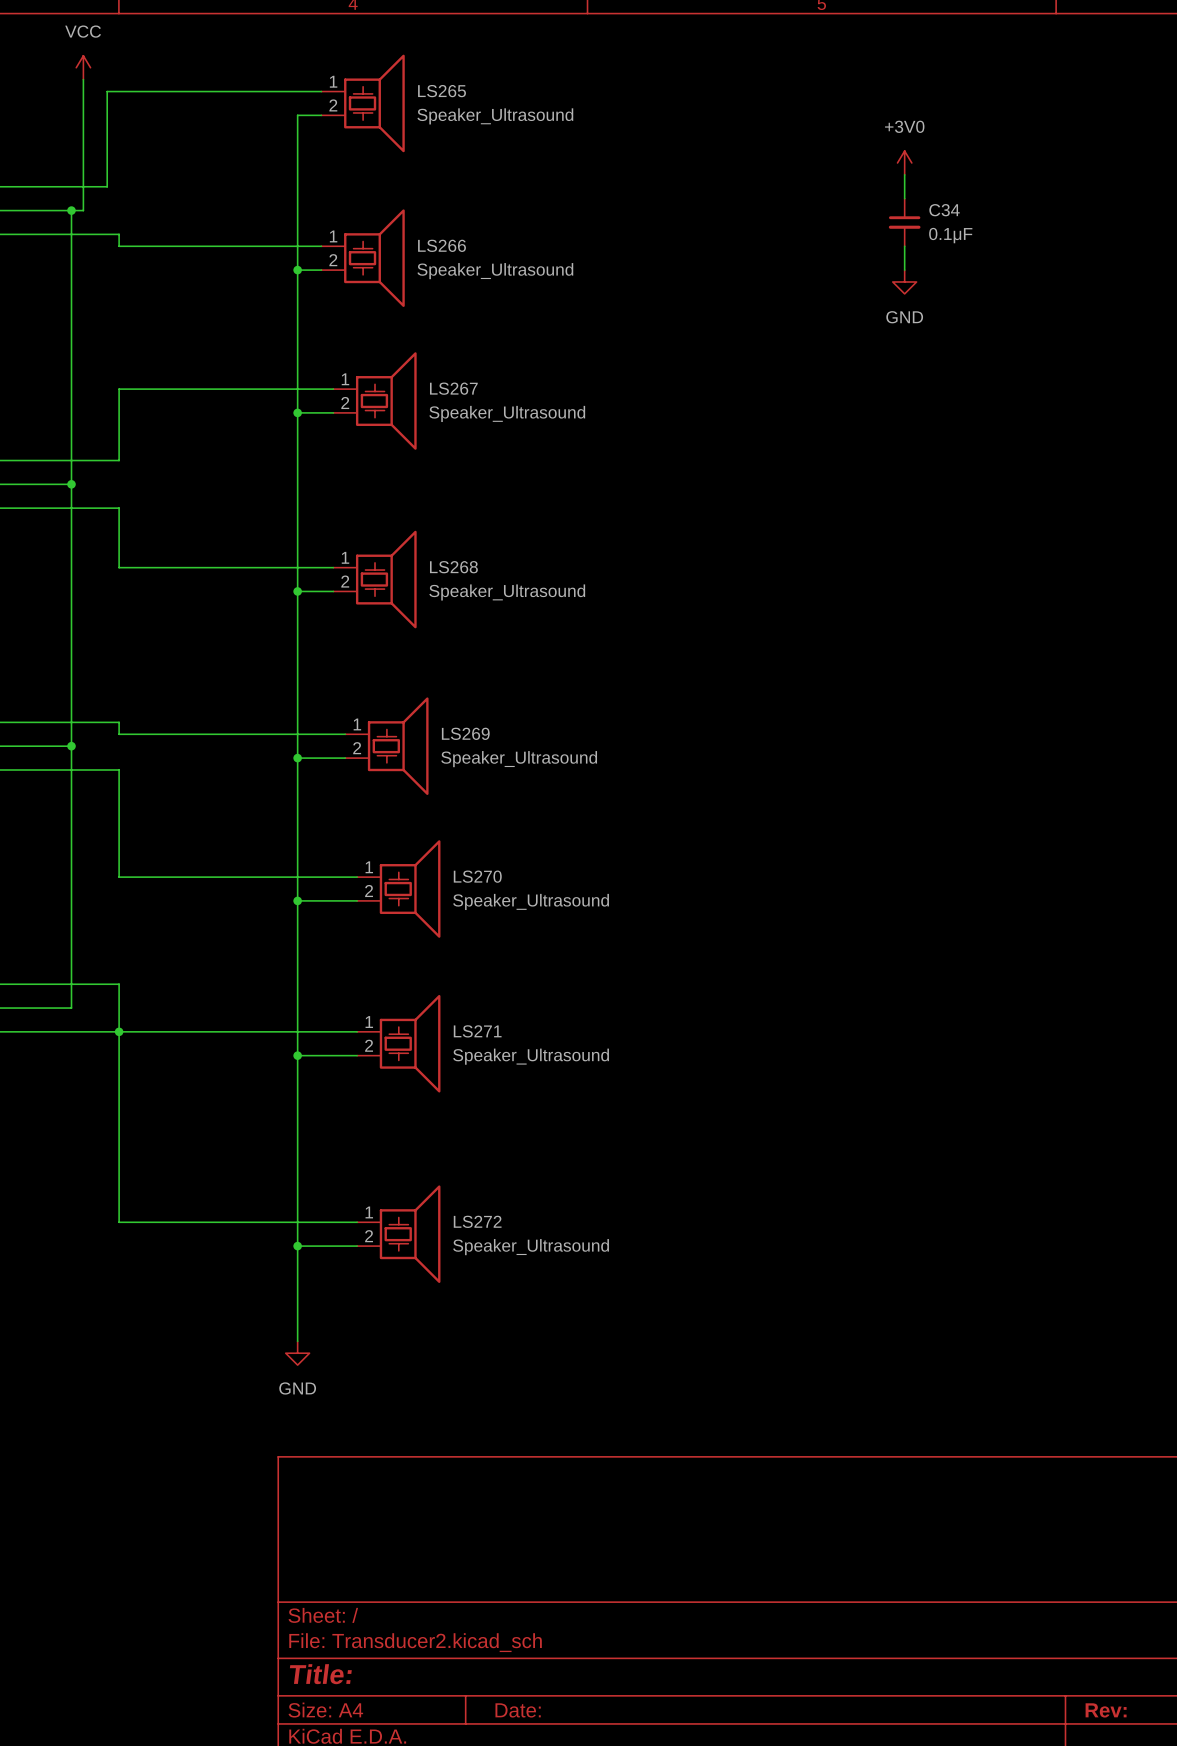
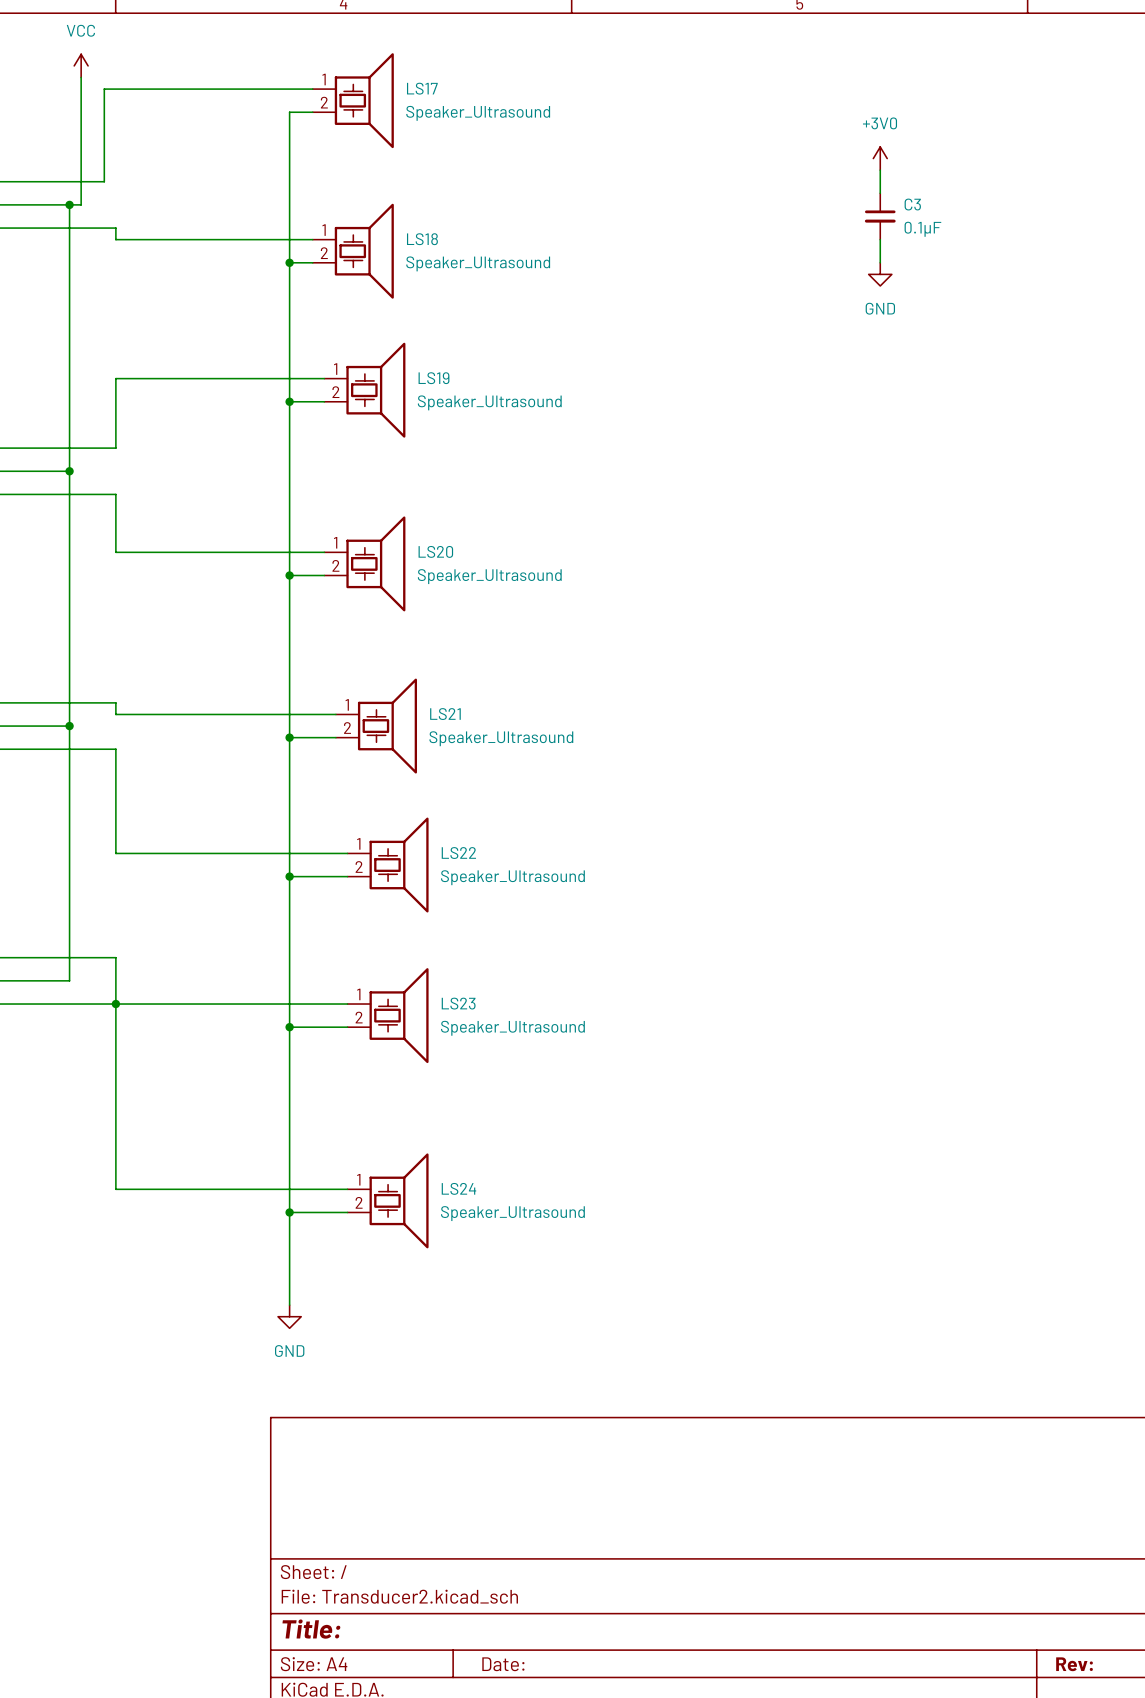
LS265 name: LS265 (442, 91) -> LS17 (422, 88)
C34 name: C34 (944, 210) -> C3 (912, 204)
LS266 name: LS266 (442, 245) -> LS18 (422, 239)
LS267 name: LS267 (453, 388) -> LS19 (433, 378)
LS268 name: LS268 (453, 567) -> LS20 (435, 551)
LS269 name: LS269 (465, 733) -> LS21 (445, 714)
LS270 name: LS270 (477, 876) -> LS22 (458, 853)
LS271 name: LS271 (477, 1031) -> LS23 (458, 1003)
LS272 name: LS272 (477, 1221) -> LS24 (458, 1188)

